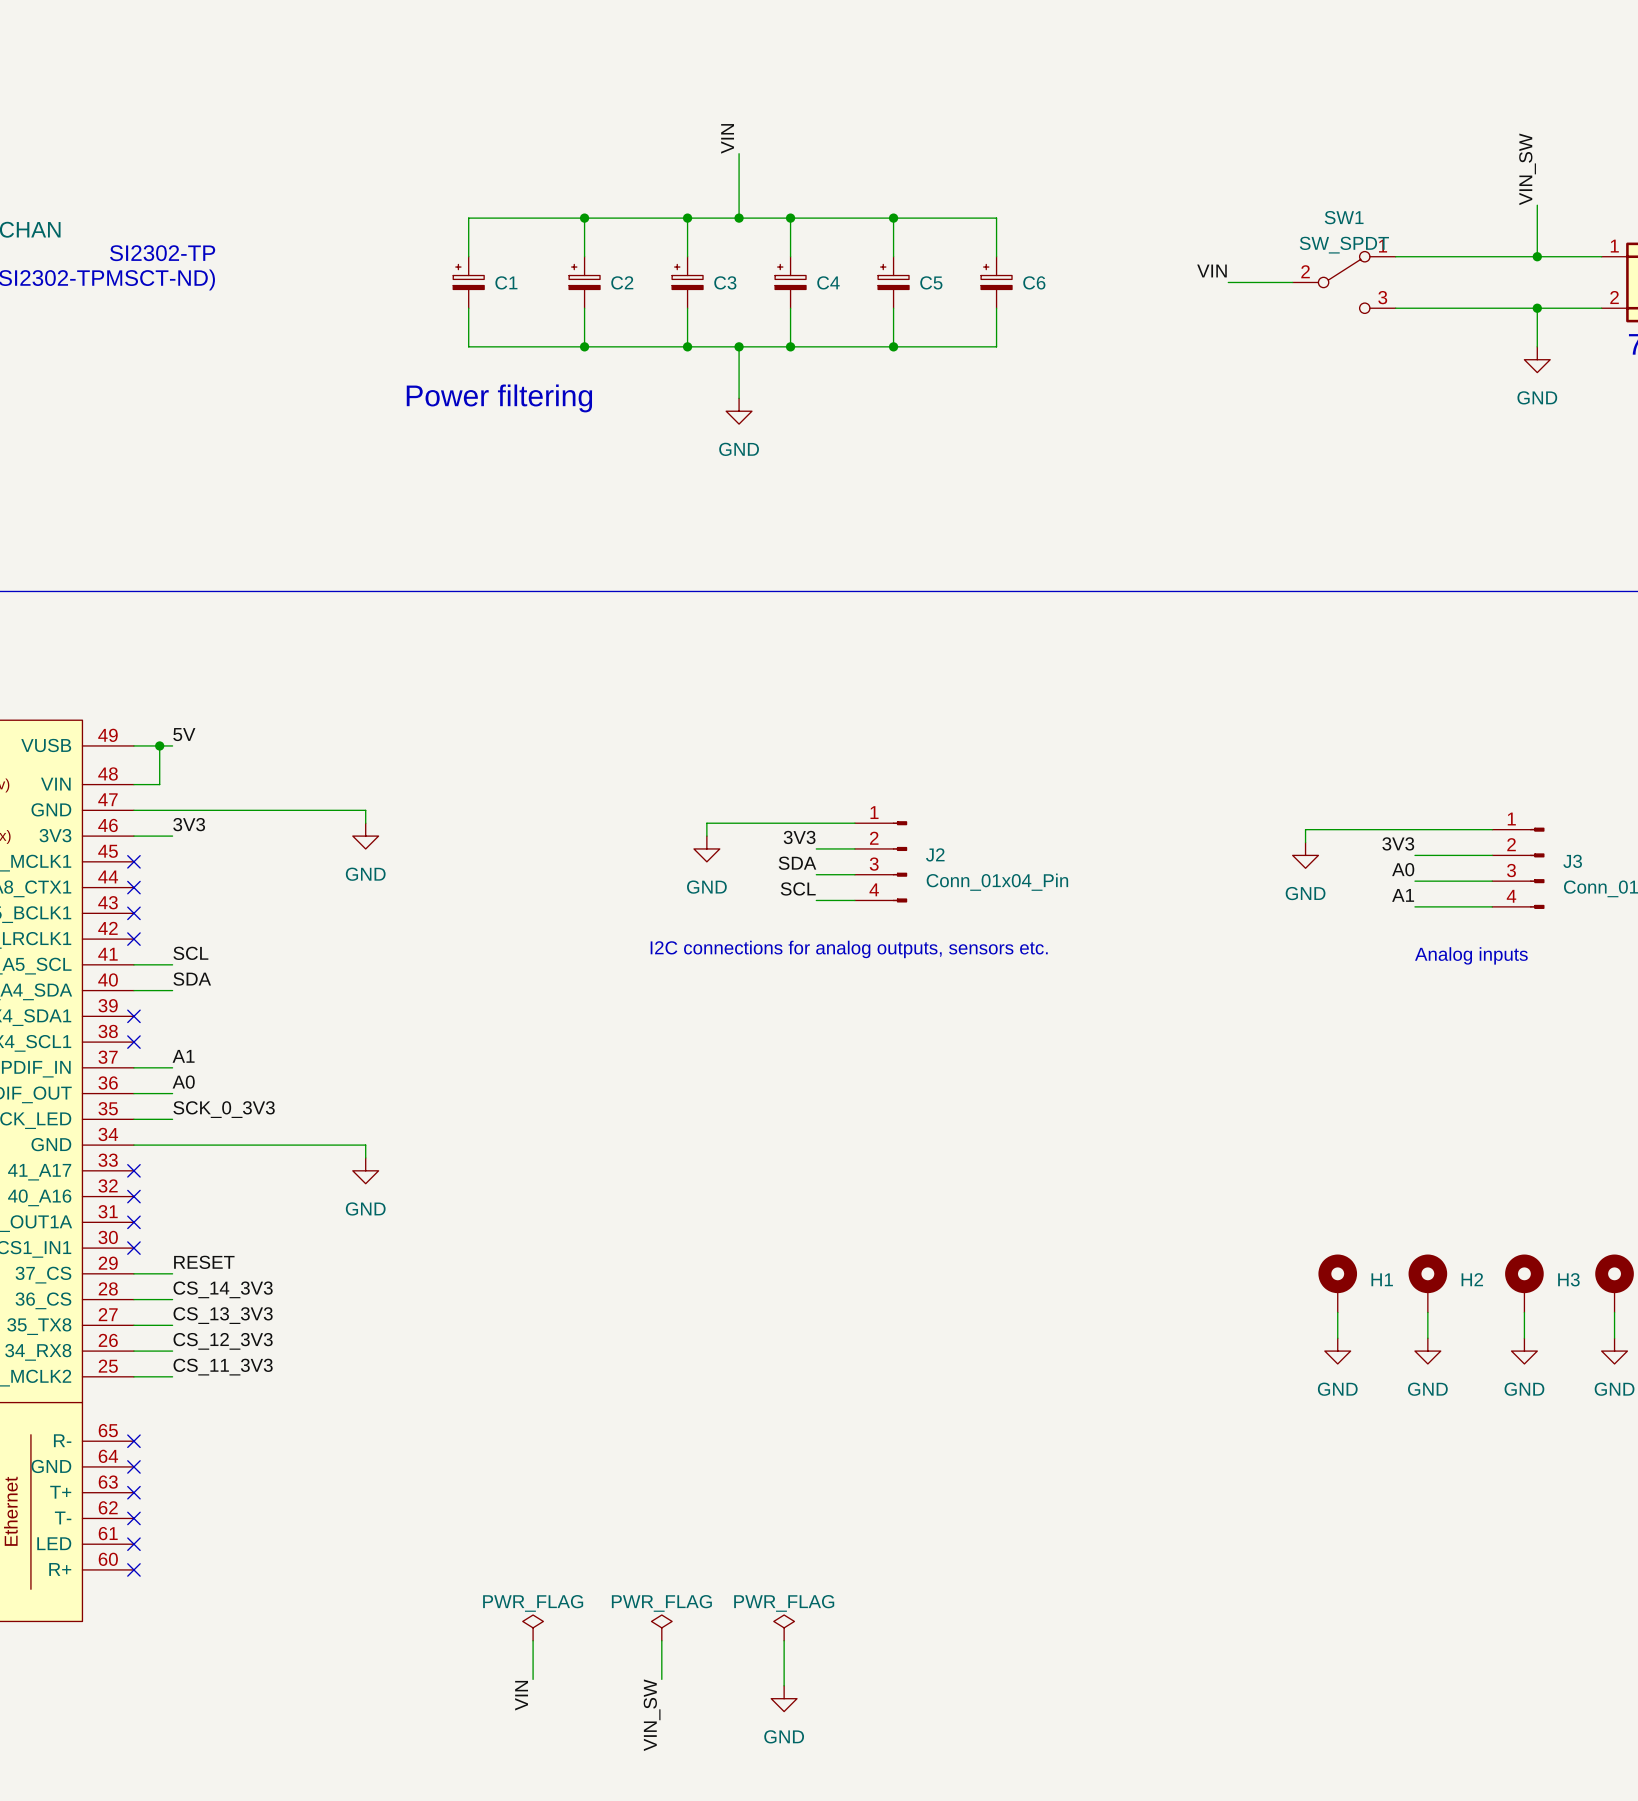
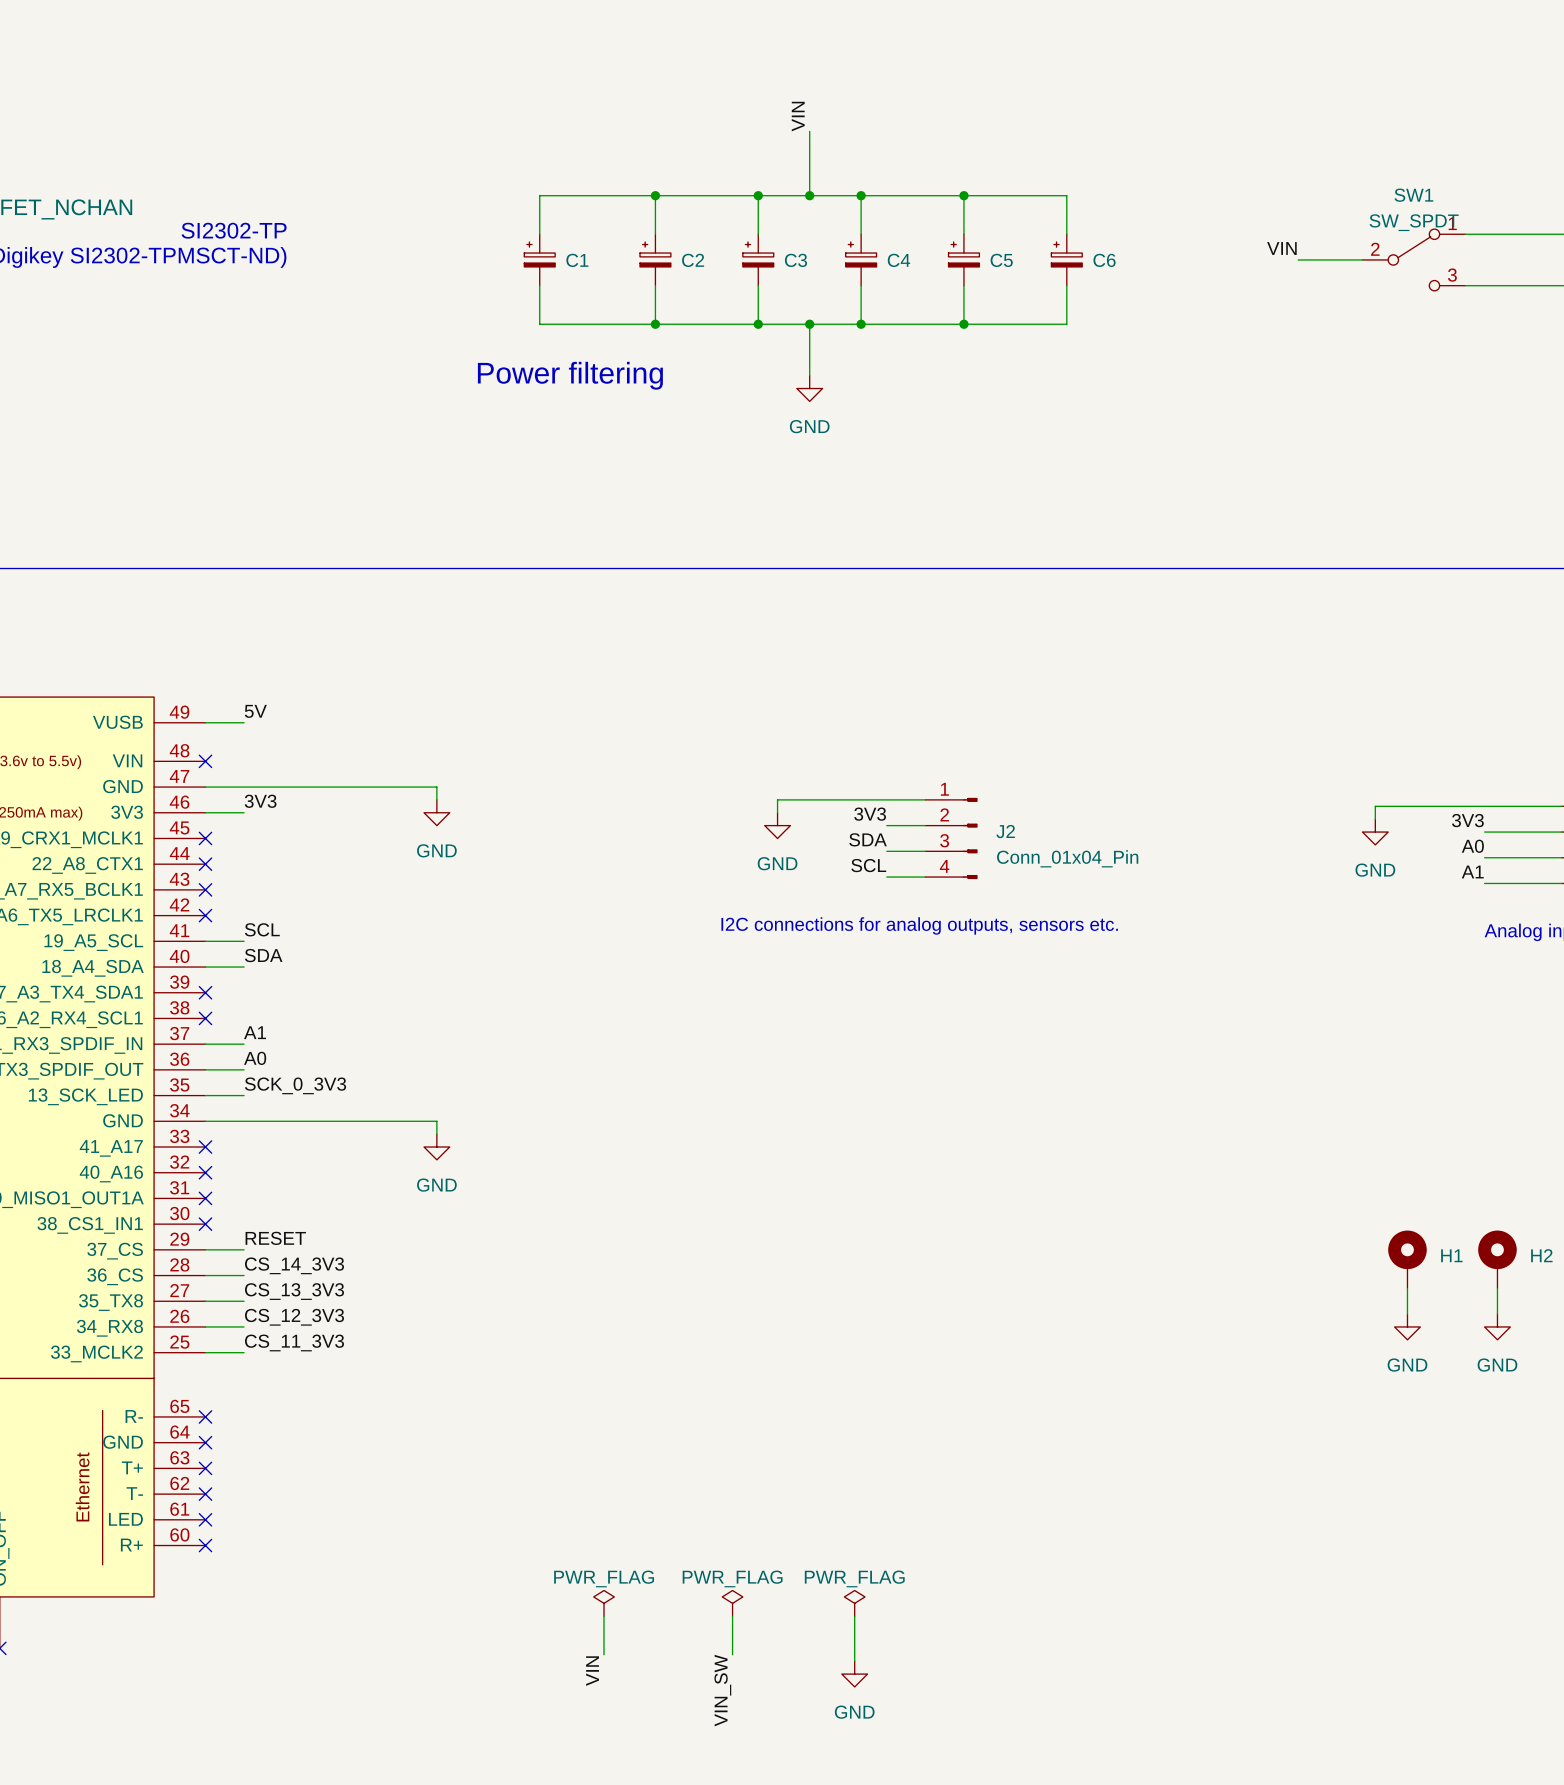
wire: (159, 745) (159, 784) (133, 784) -> none
junction: (159, 745) -> none
no-connect mark: none -> (205, 761)

